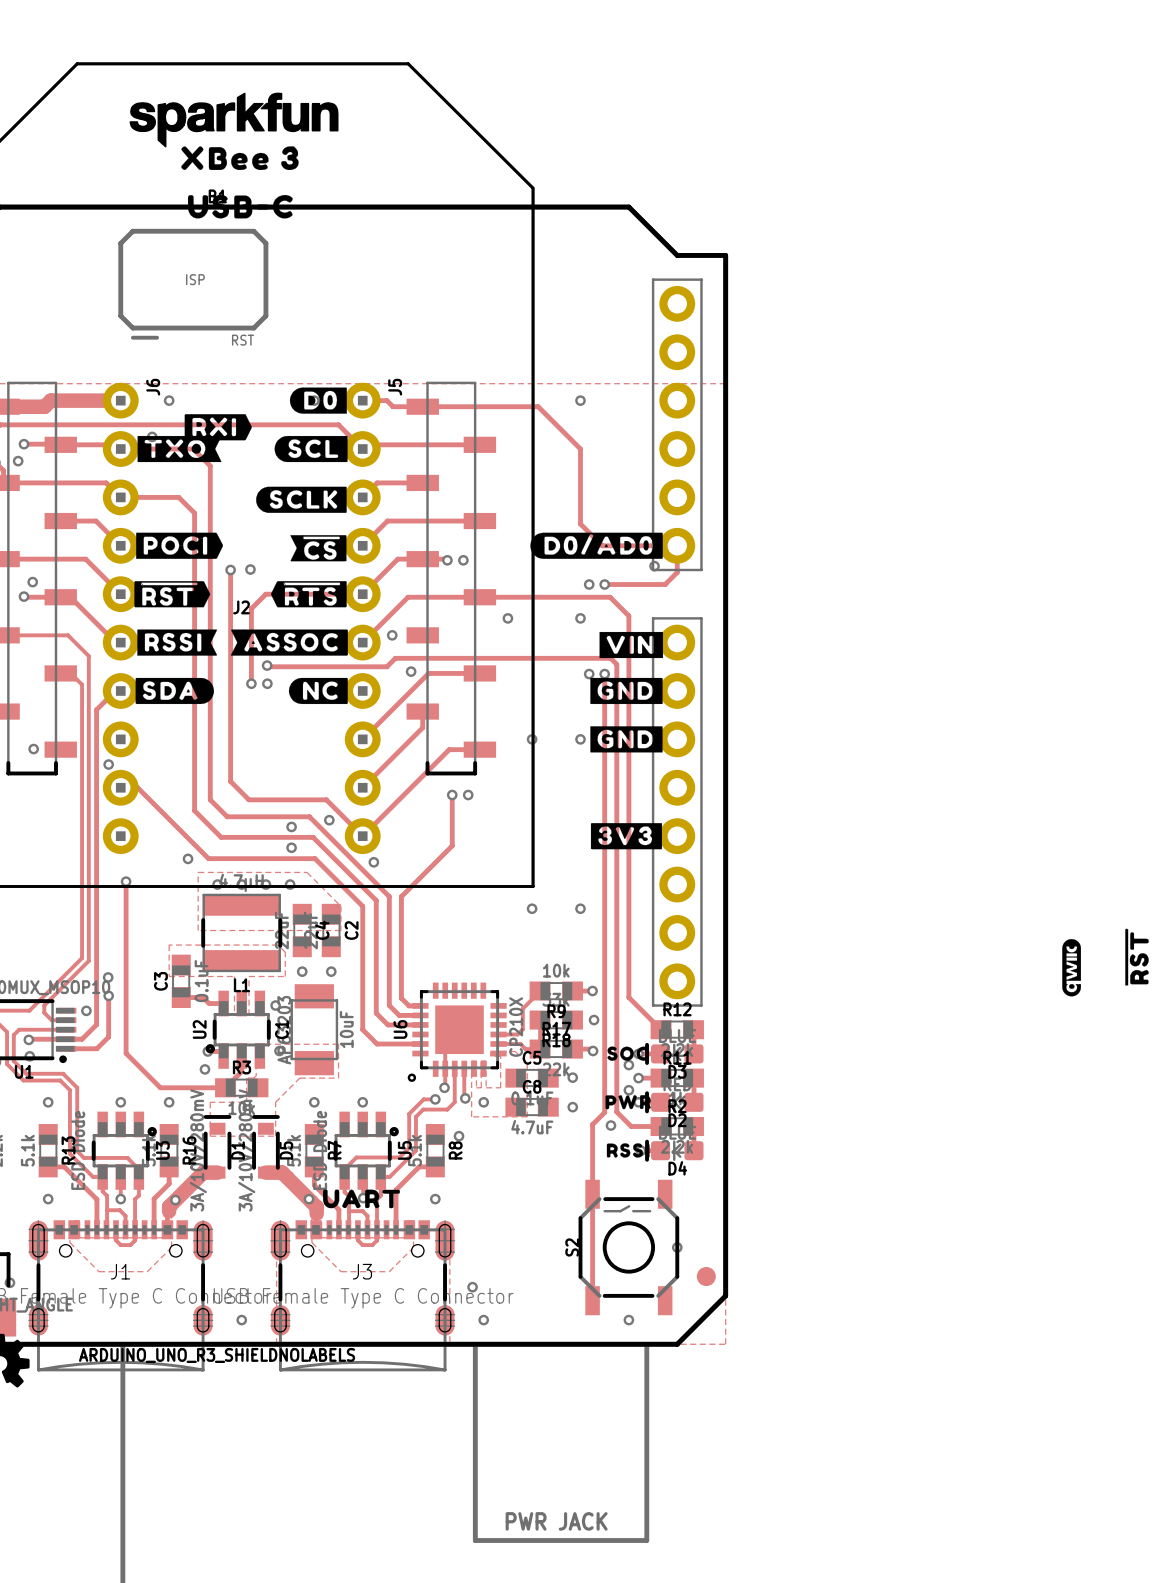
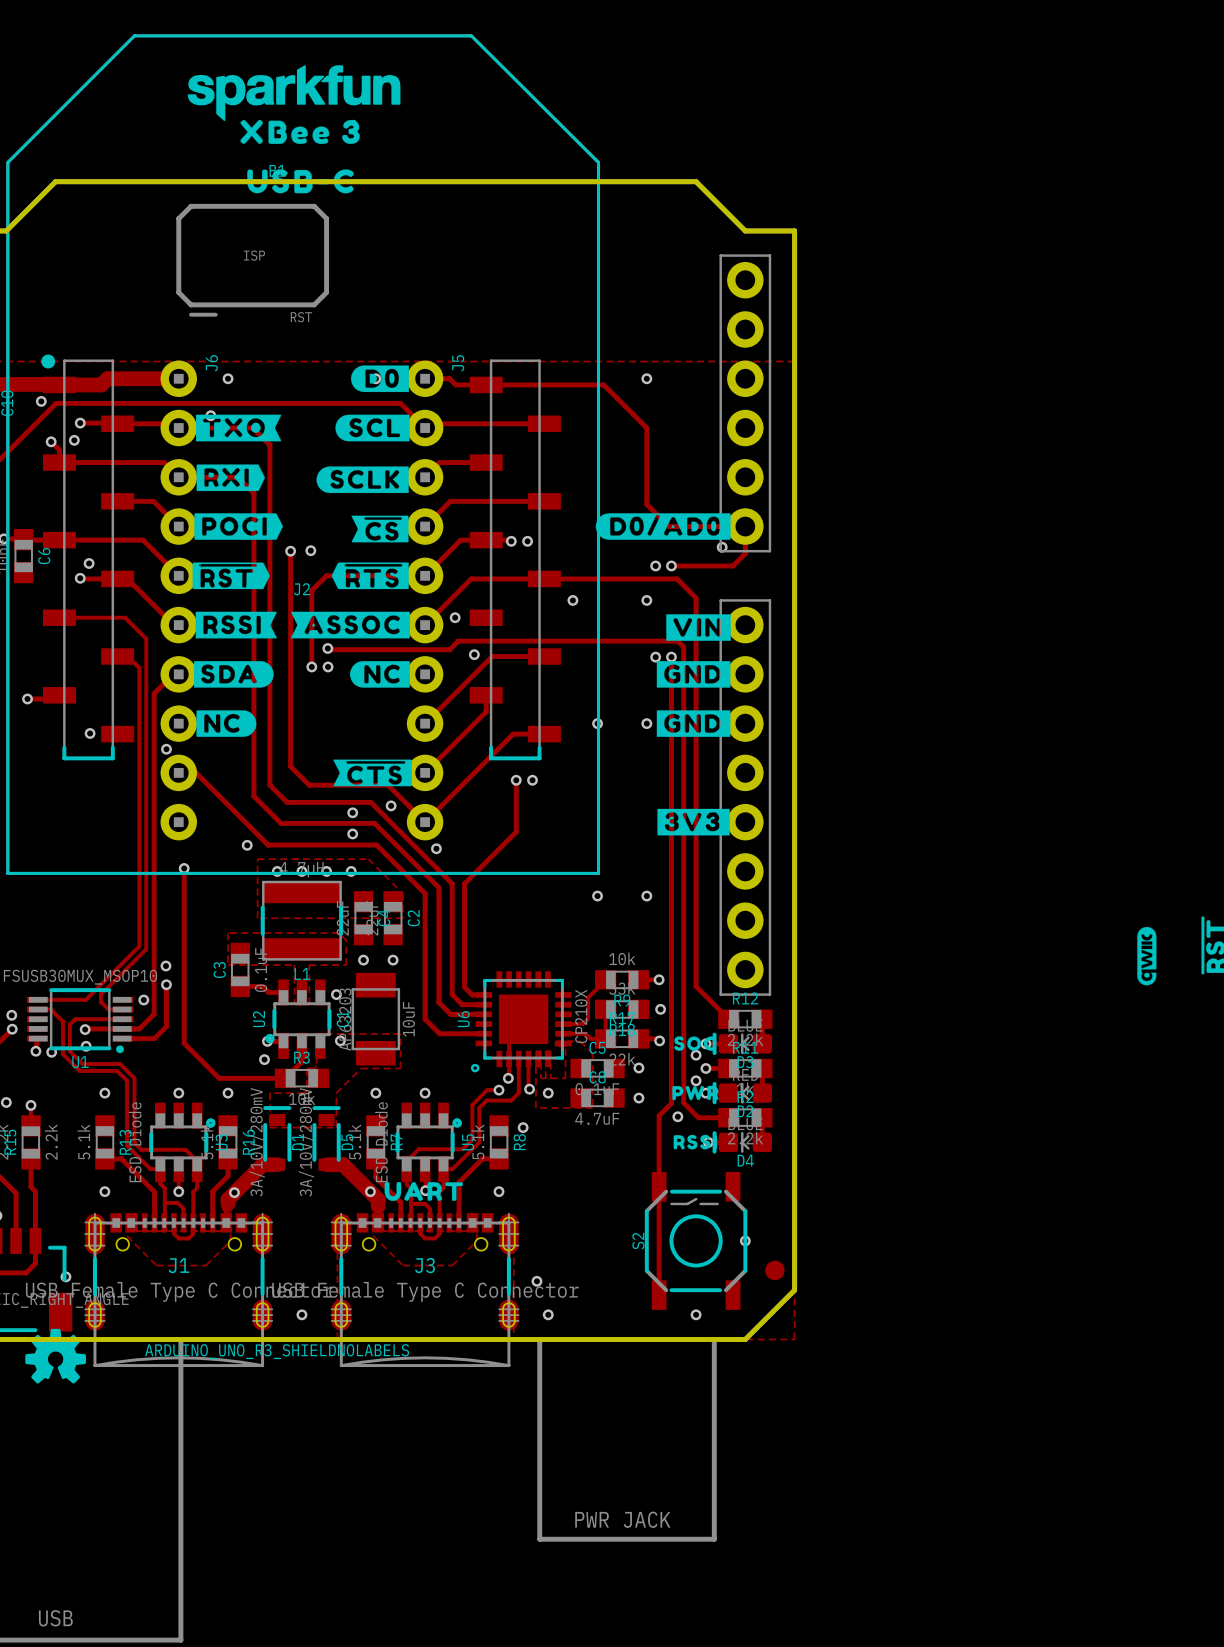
drawing position: (218, 427) -> (230, 477)
drawing: none -> [196, 710, 257, 737]
drawing: none -> [333, 759, 412, 787]

